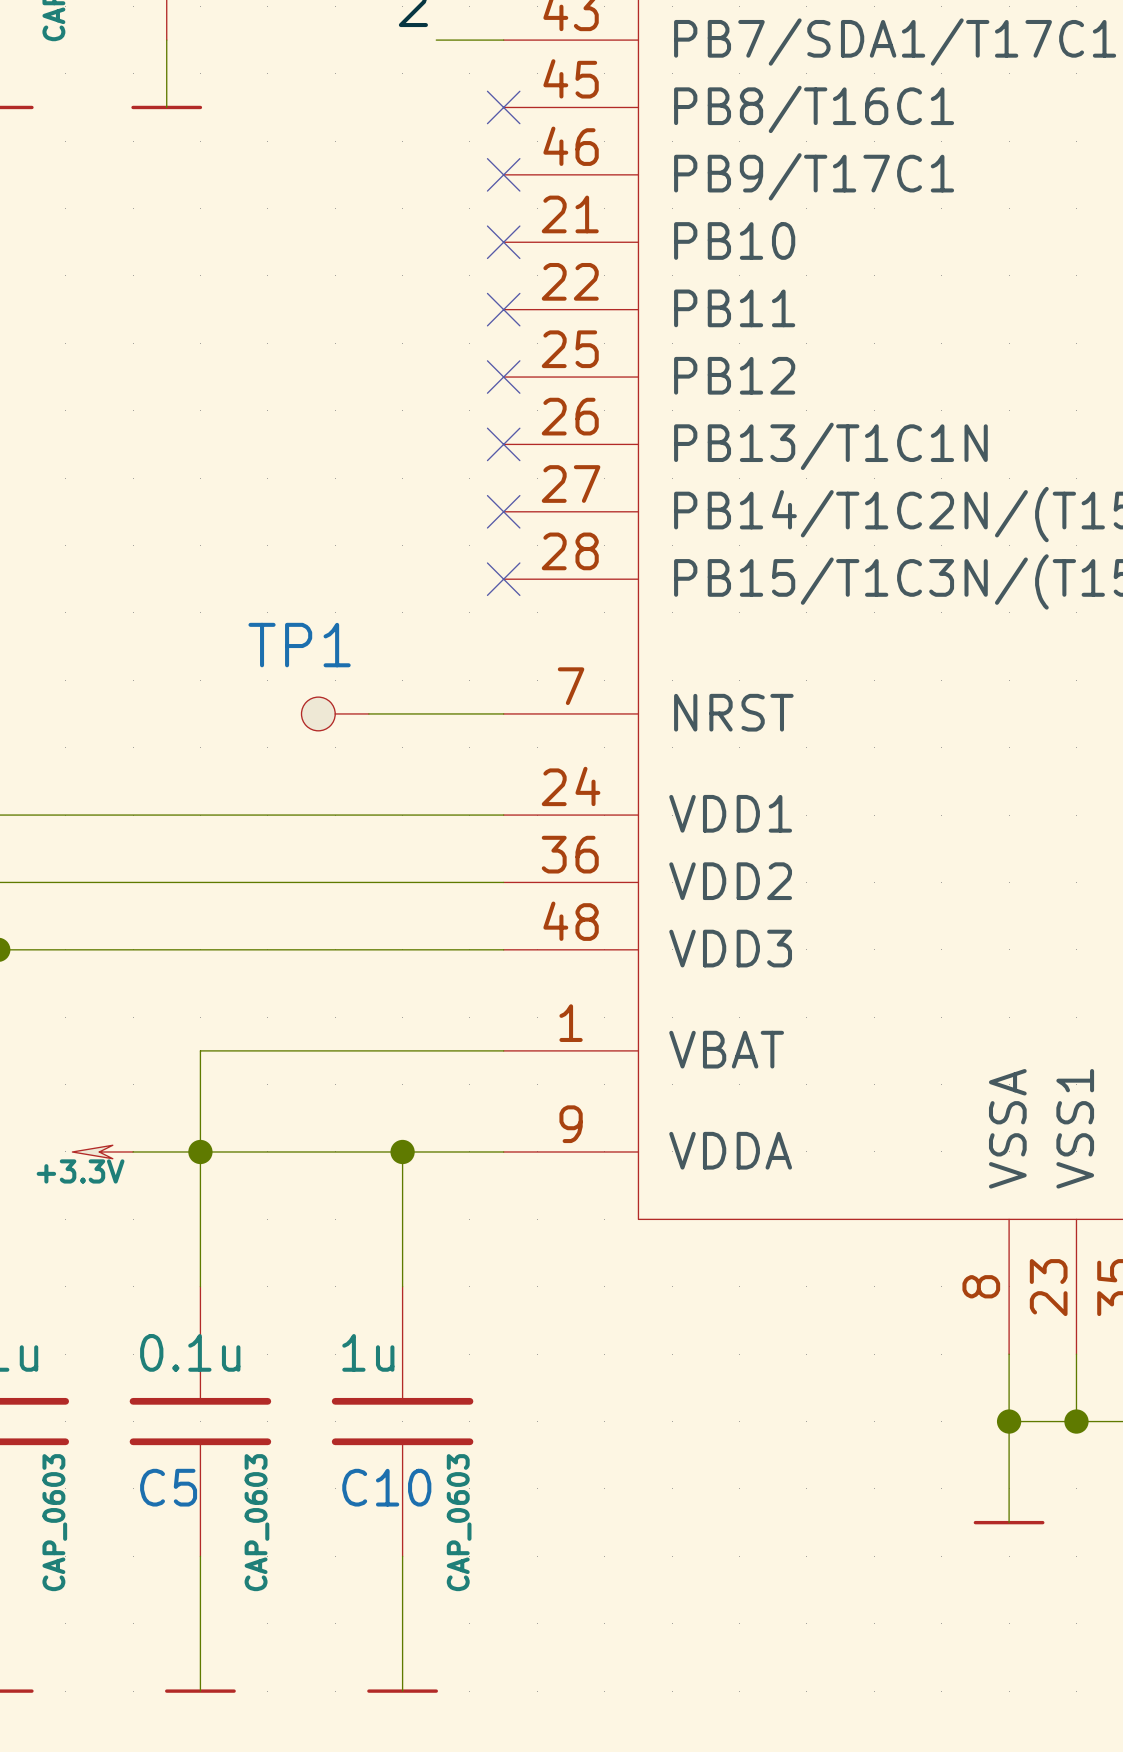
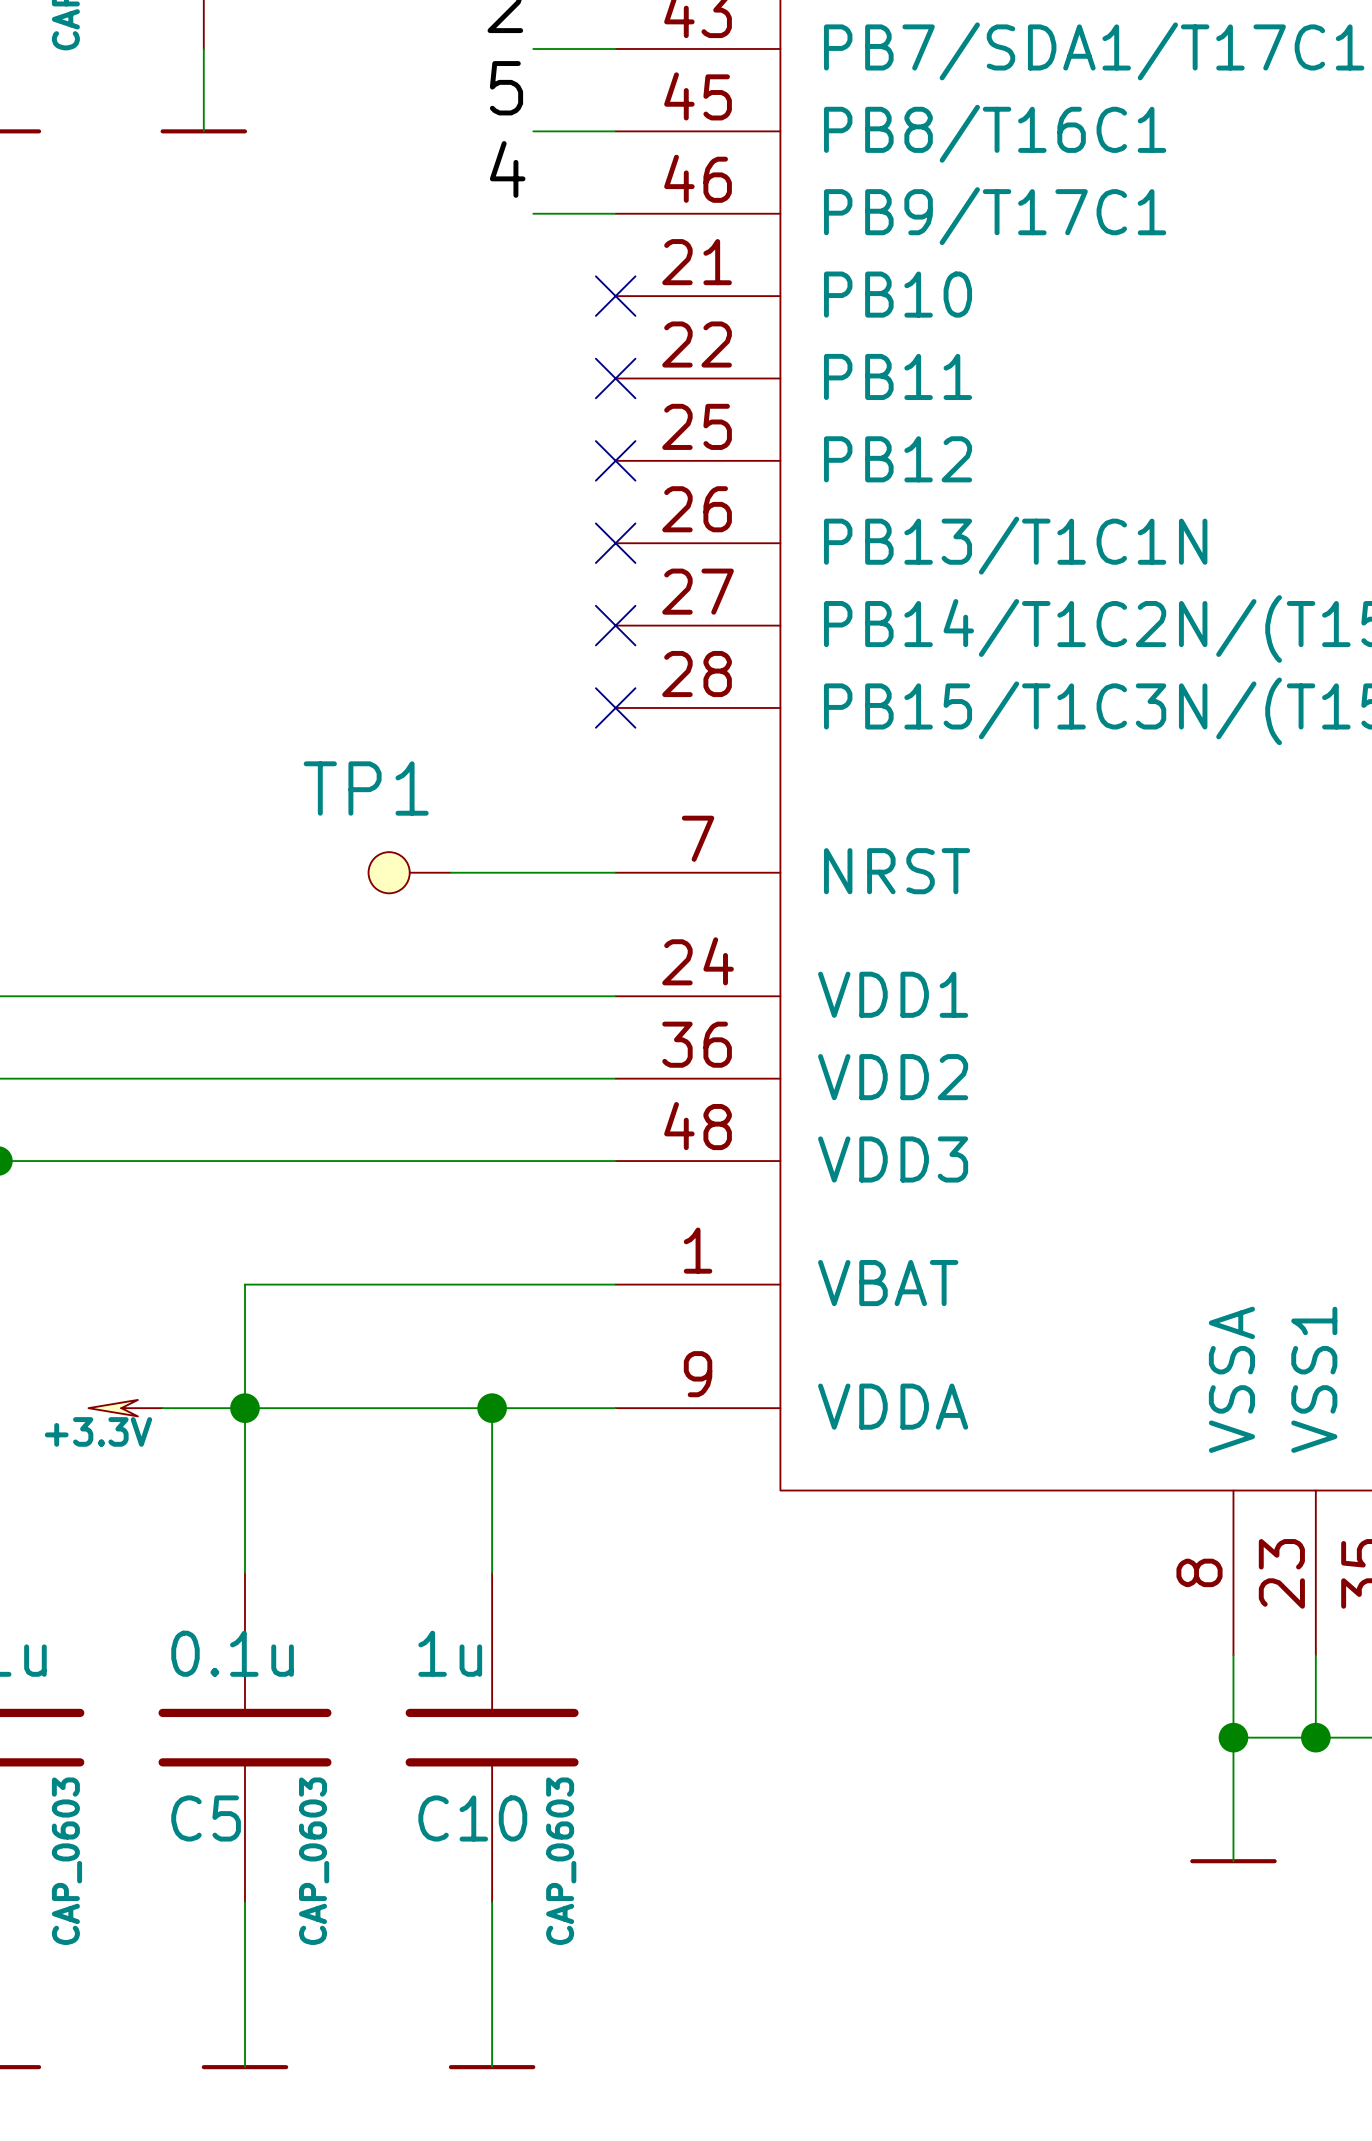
label: none -> 5 (506, 88)
wire: none -> (533, 131) (615, 131)
no-connect mark: (503, 107) -> none
label: none -> 4 (507, 169)
wire: none -> (533, 213) (615, 213)
no-connect mark: (503, 174) -> none

